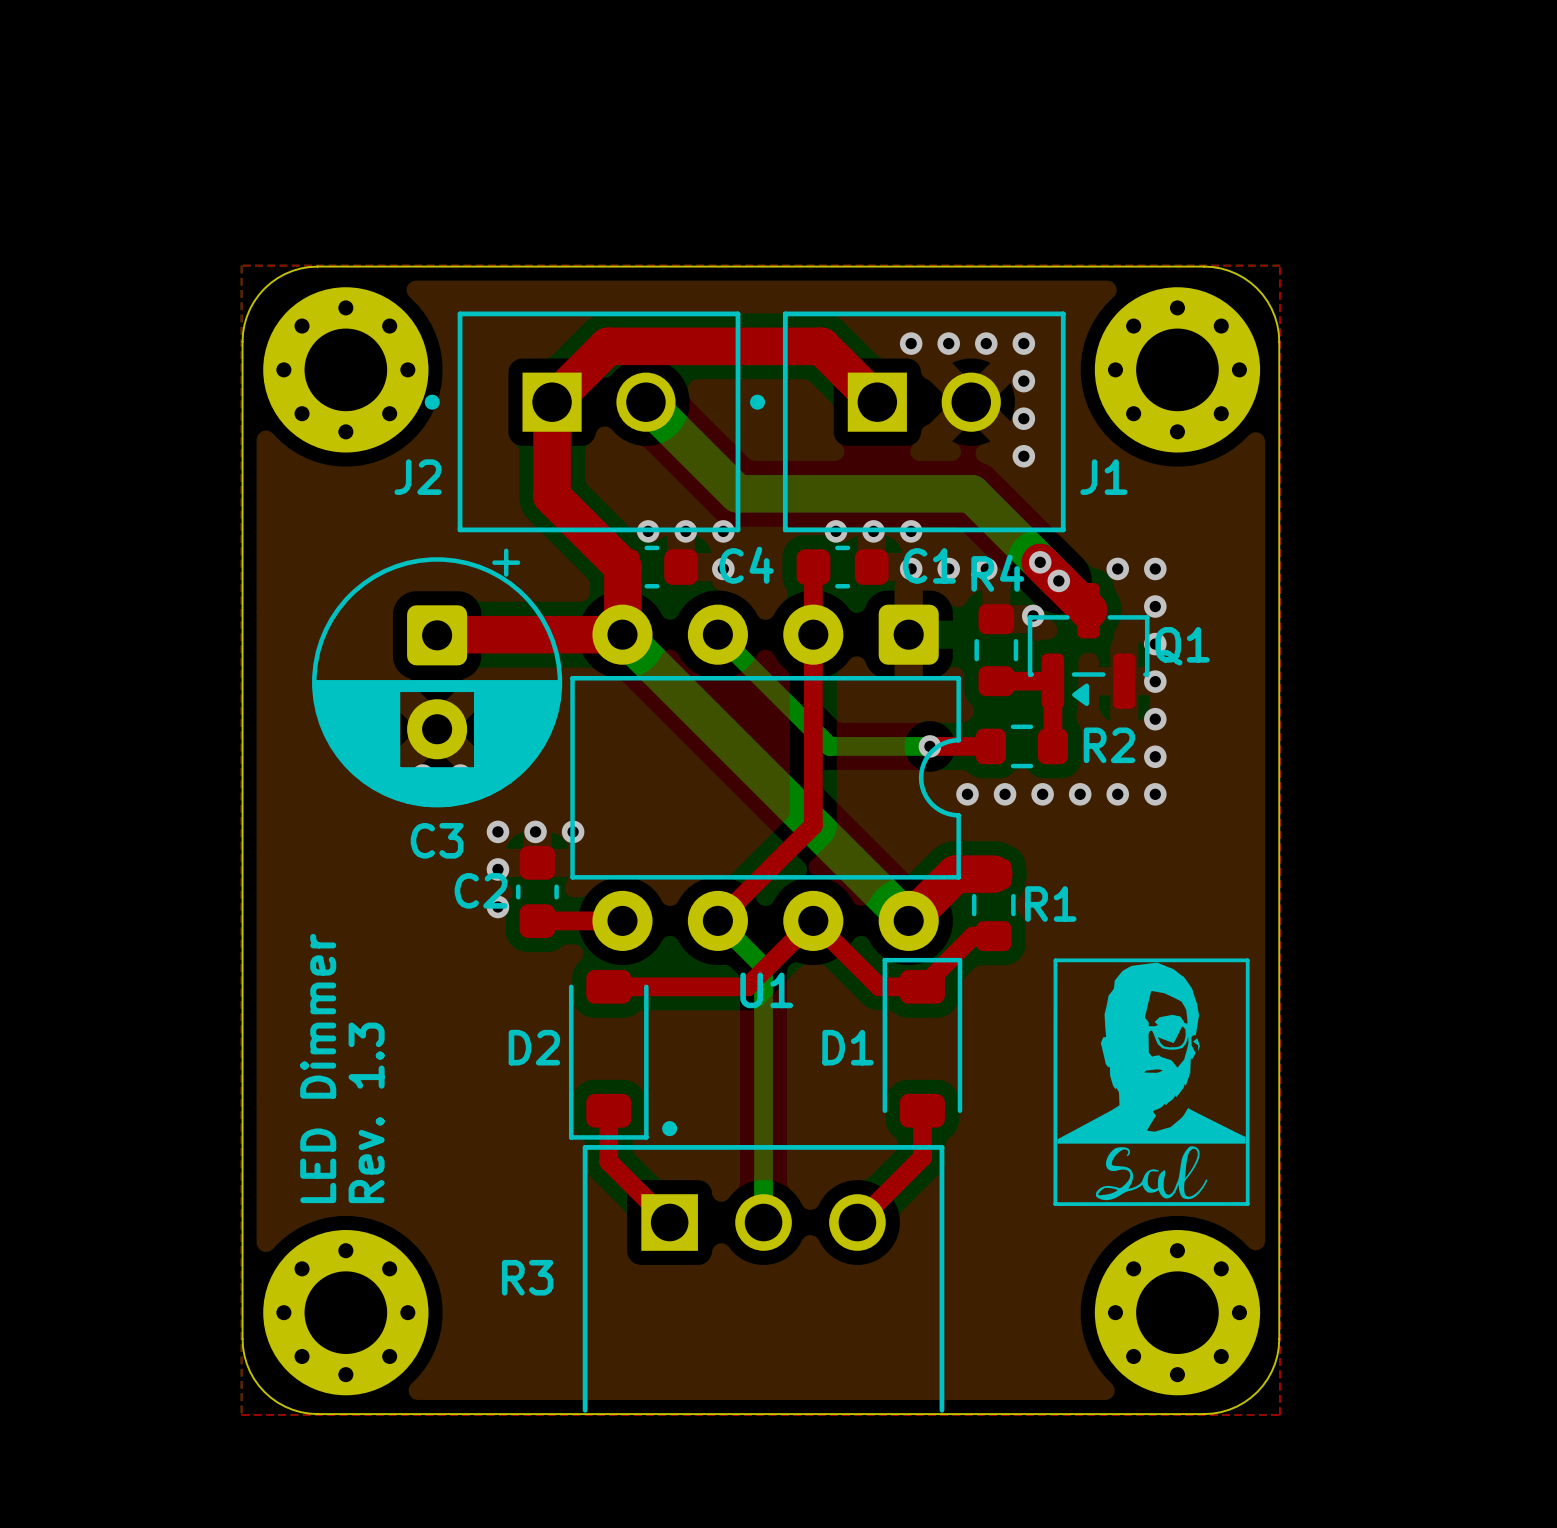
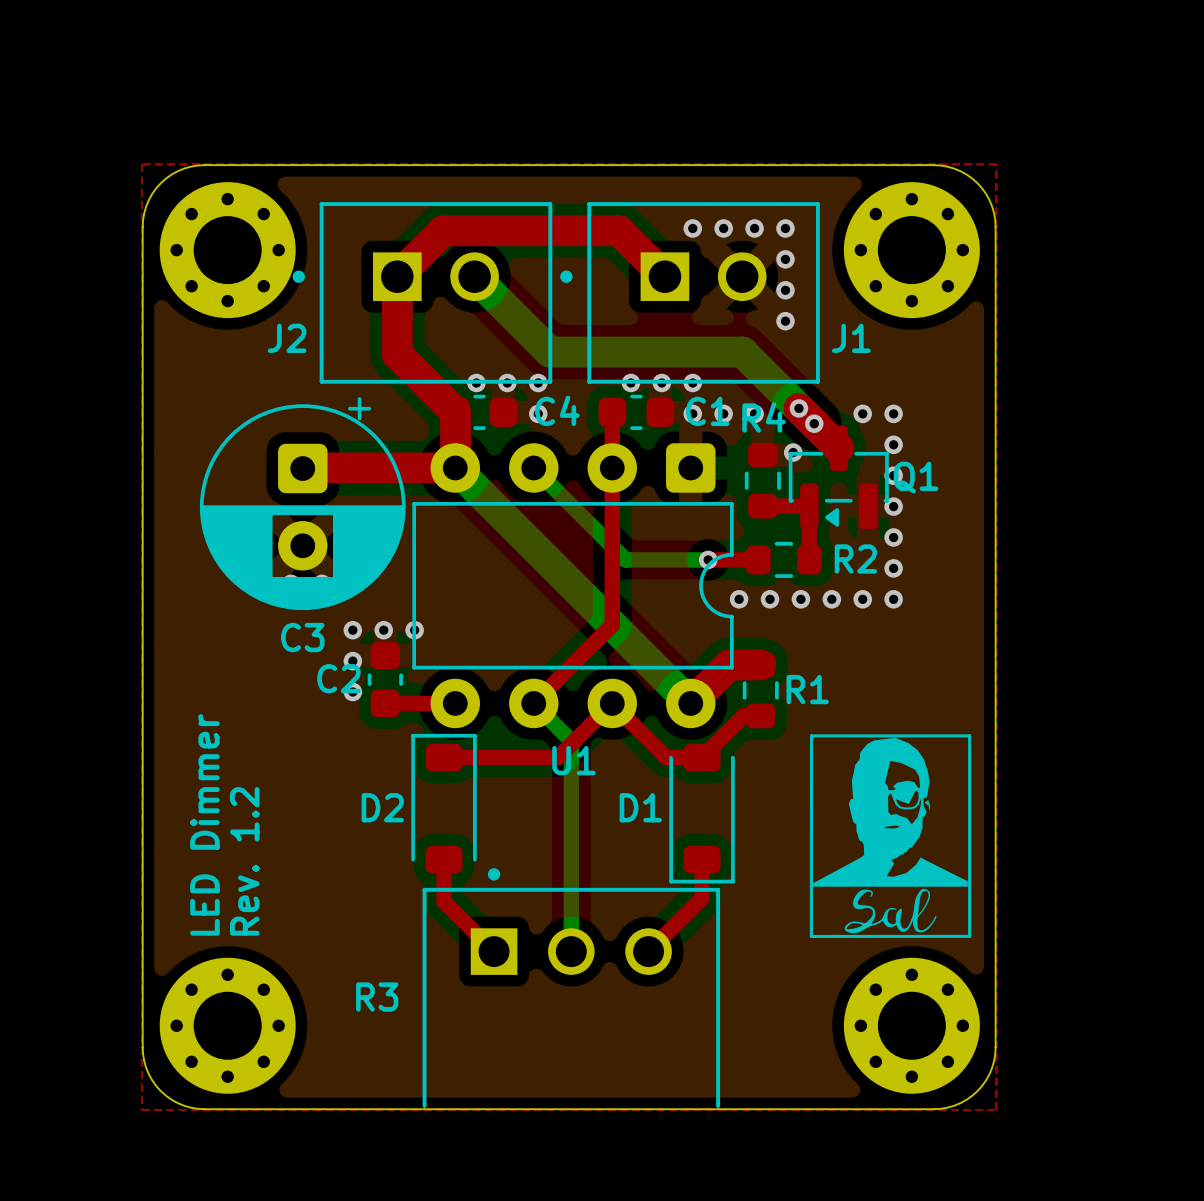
D1 rotation: 0° (922, 1042) -> 180° (702, 813)
D2 rotation: 0° (608, 1054) -> 180° (444, 803)
text: Rev. 1.3 (366, 1112) -> Rev. 1.2 (244, 861)

